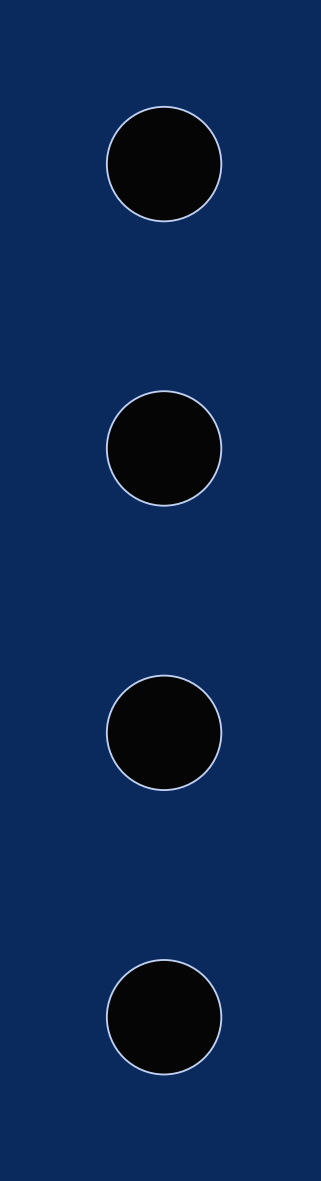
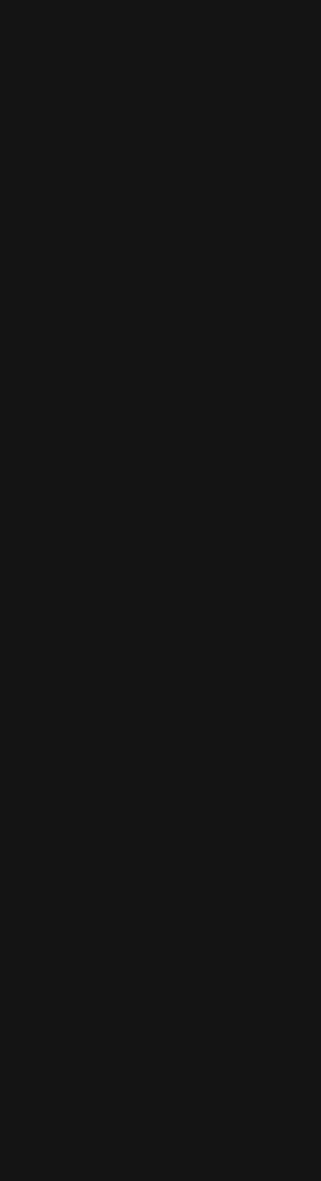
part: (164, 164) -> none
part: (164, 448) -> none
part: (164, 732) -> none
part: (164, 1017) -> none

